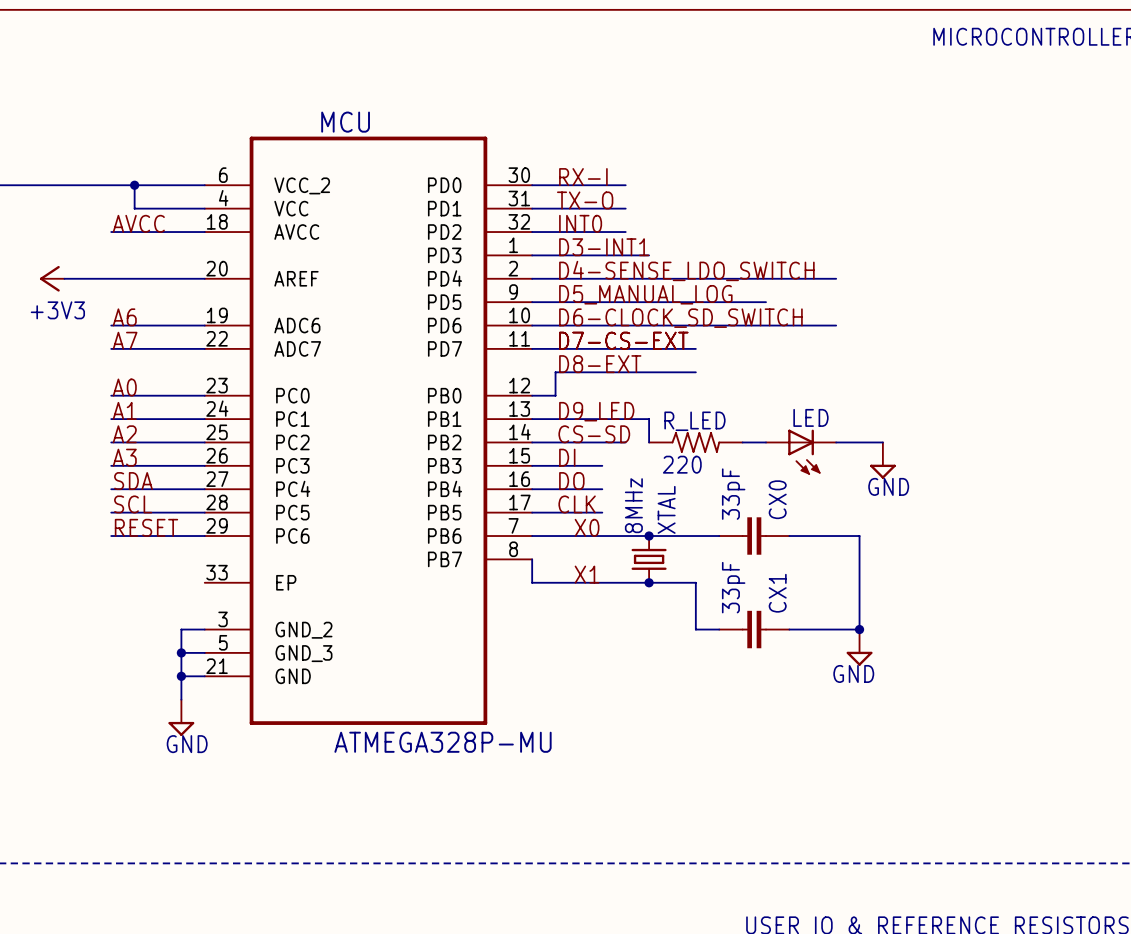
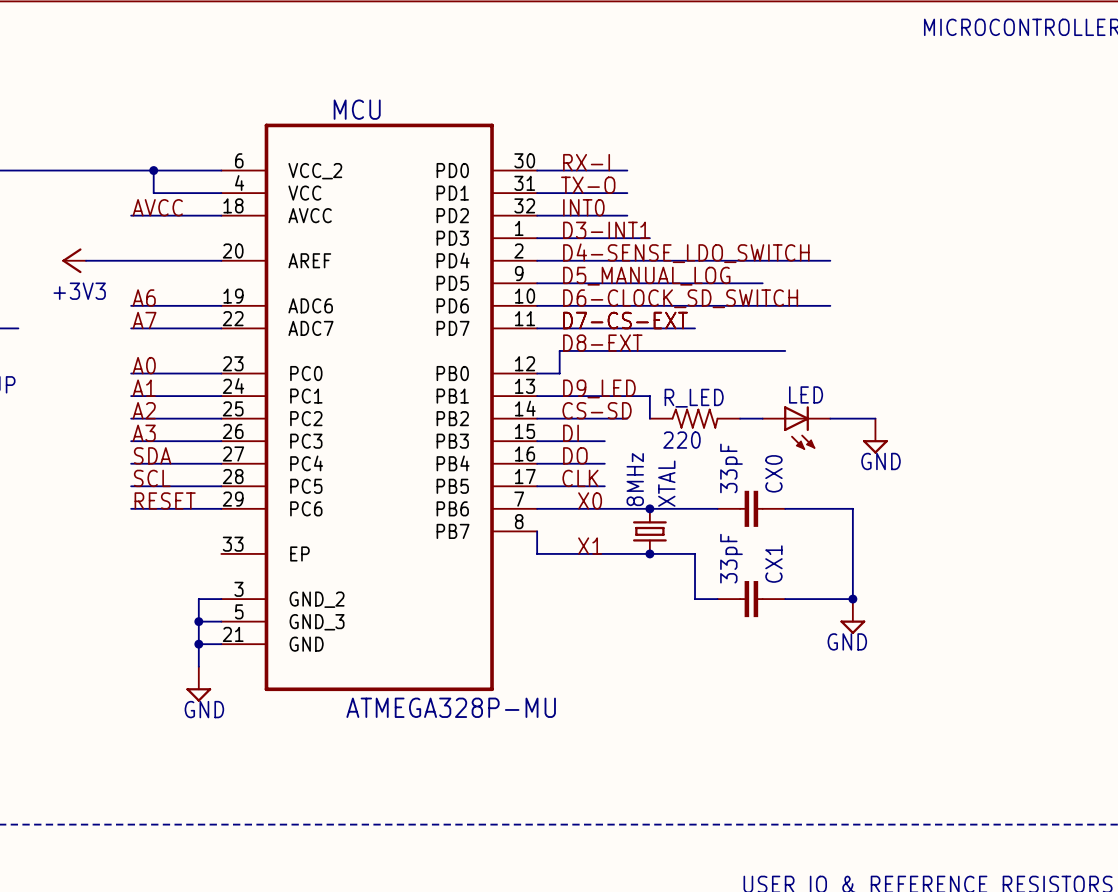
wire: none -> (695, 350) (785, 350)

